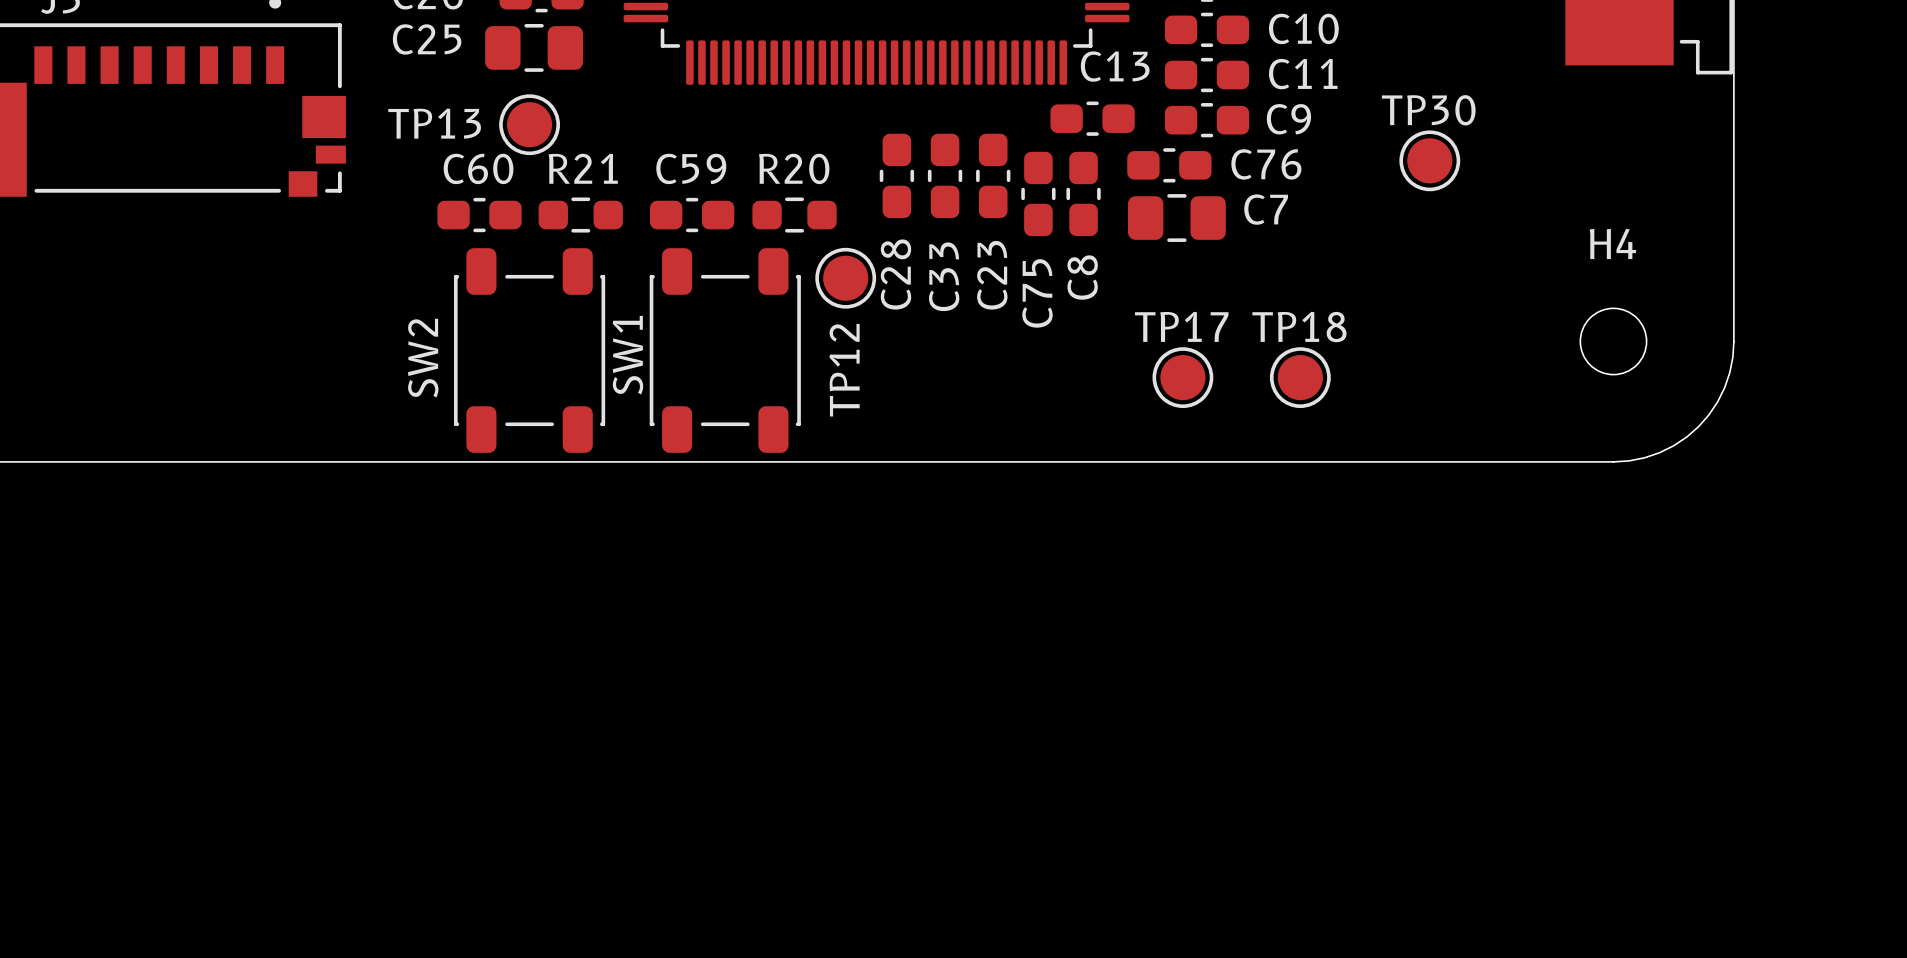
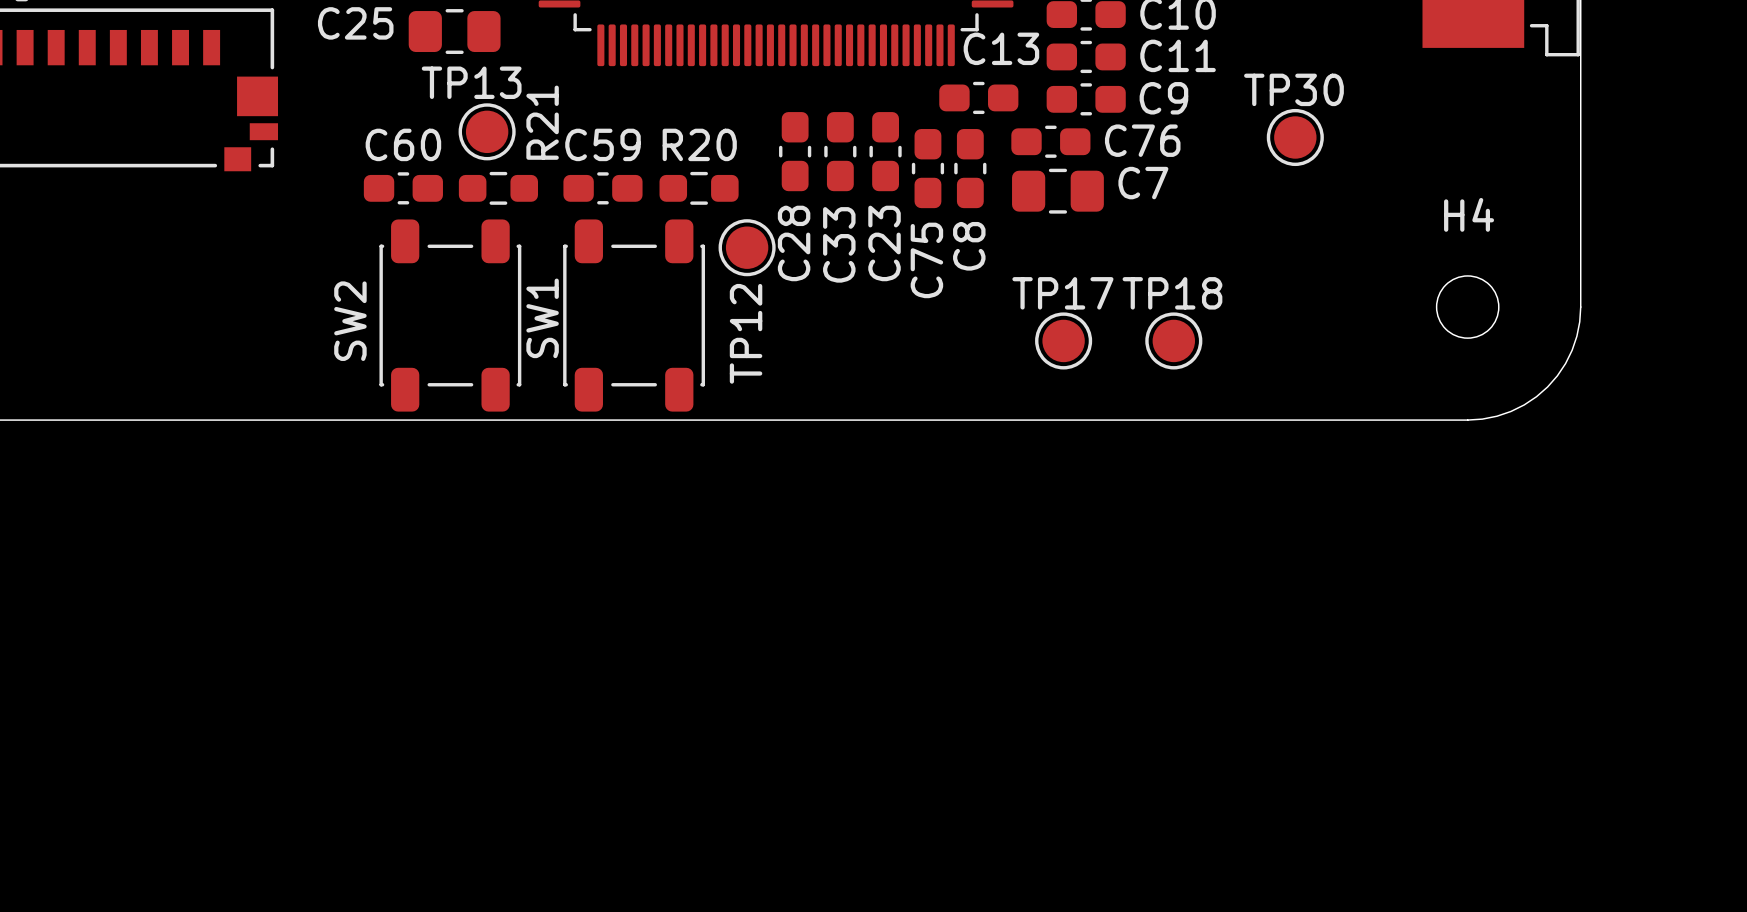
TP13 name position: TP13 (434, 123) -> TP13 (471, 82)
TP13 position: (529, 124) -> (487, 131)
R21 name rotation: 0° (583, 168) -> 90° counterclockwise (542, 122)

